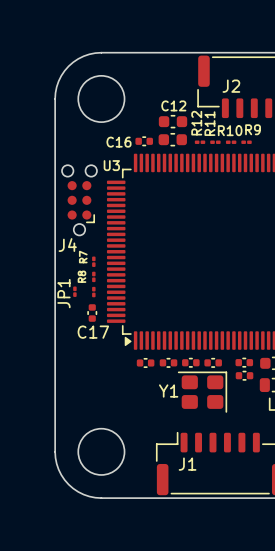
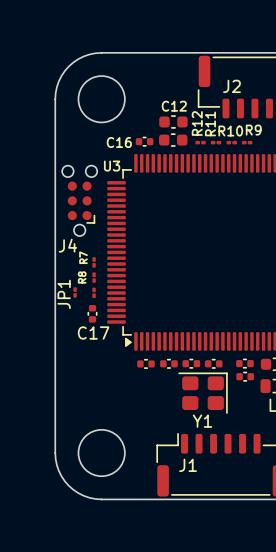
Y1 name position: Y1 (168, 391) -> Y1 (202, 421)

